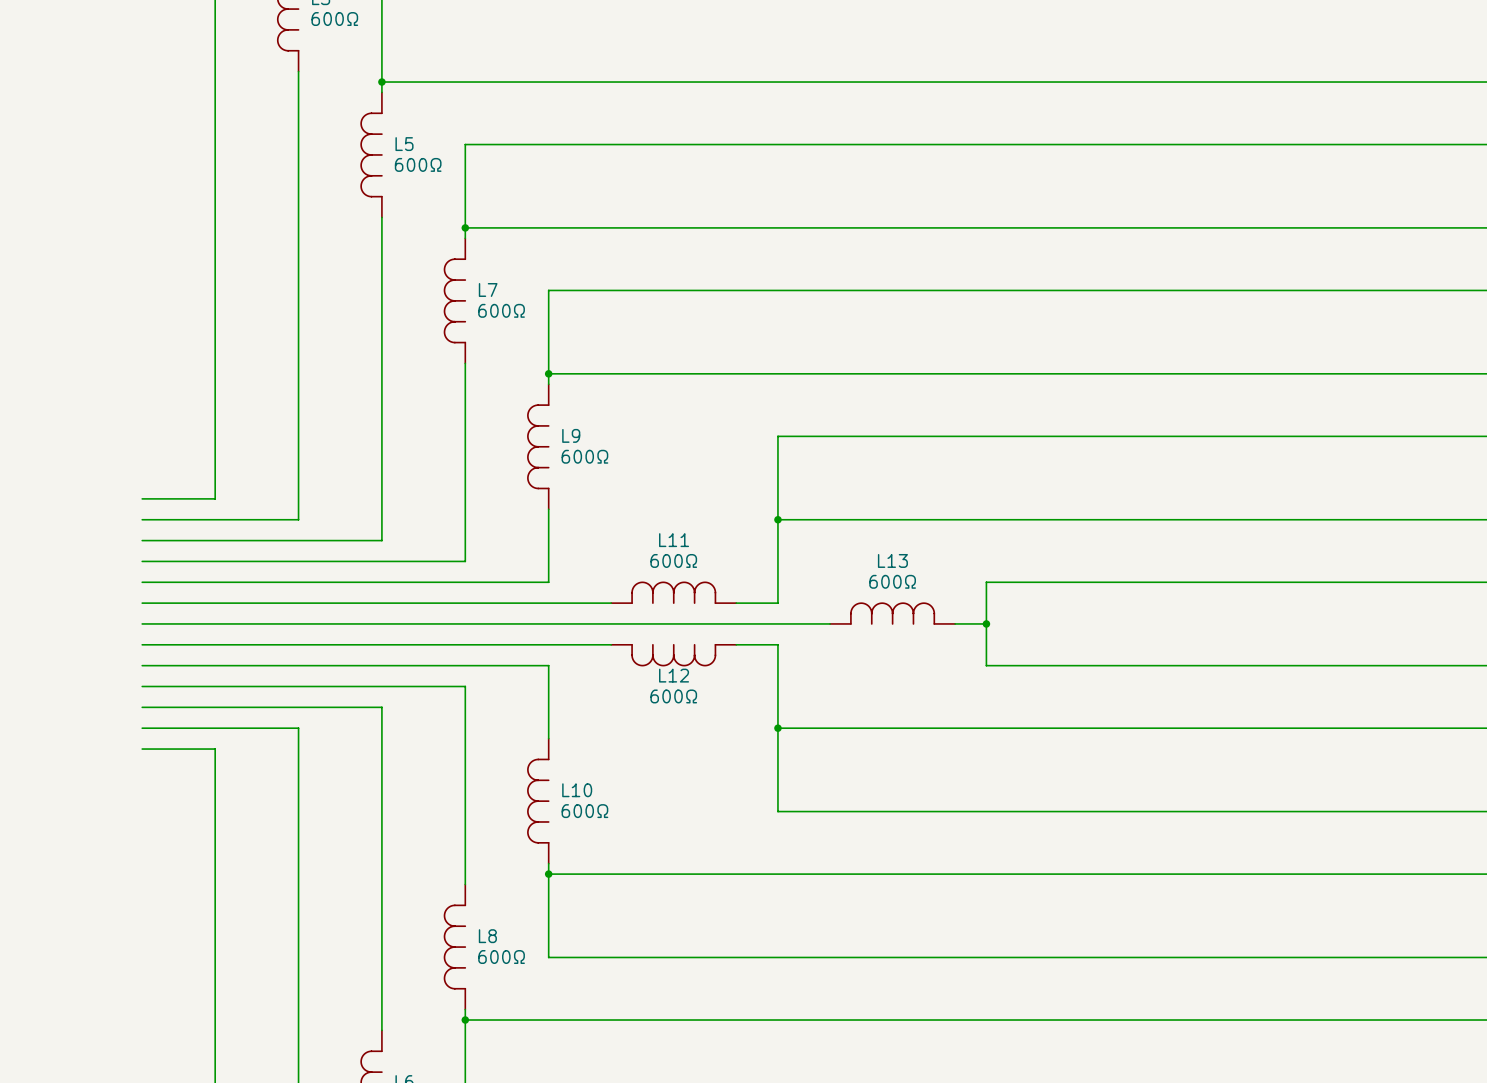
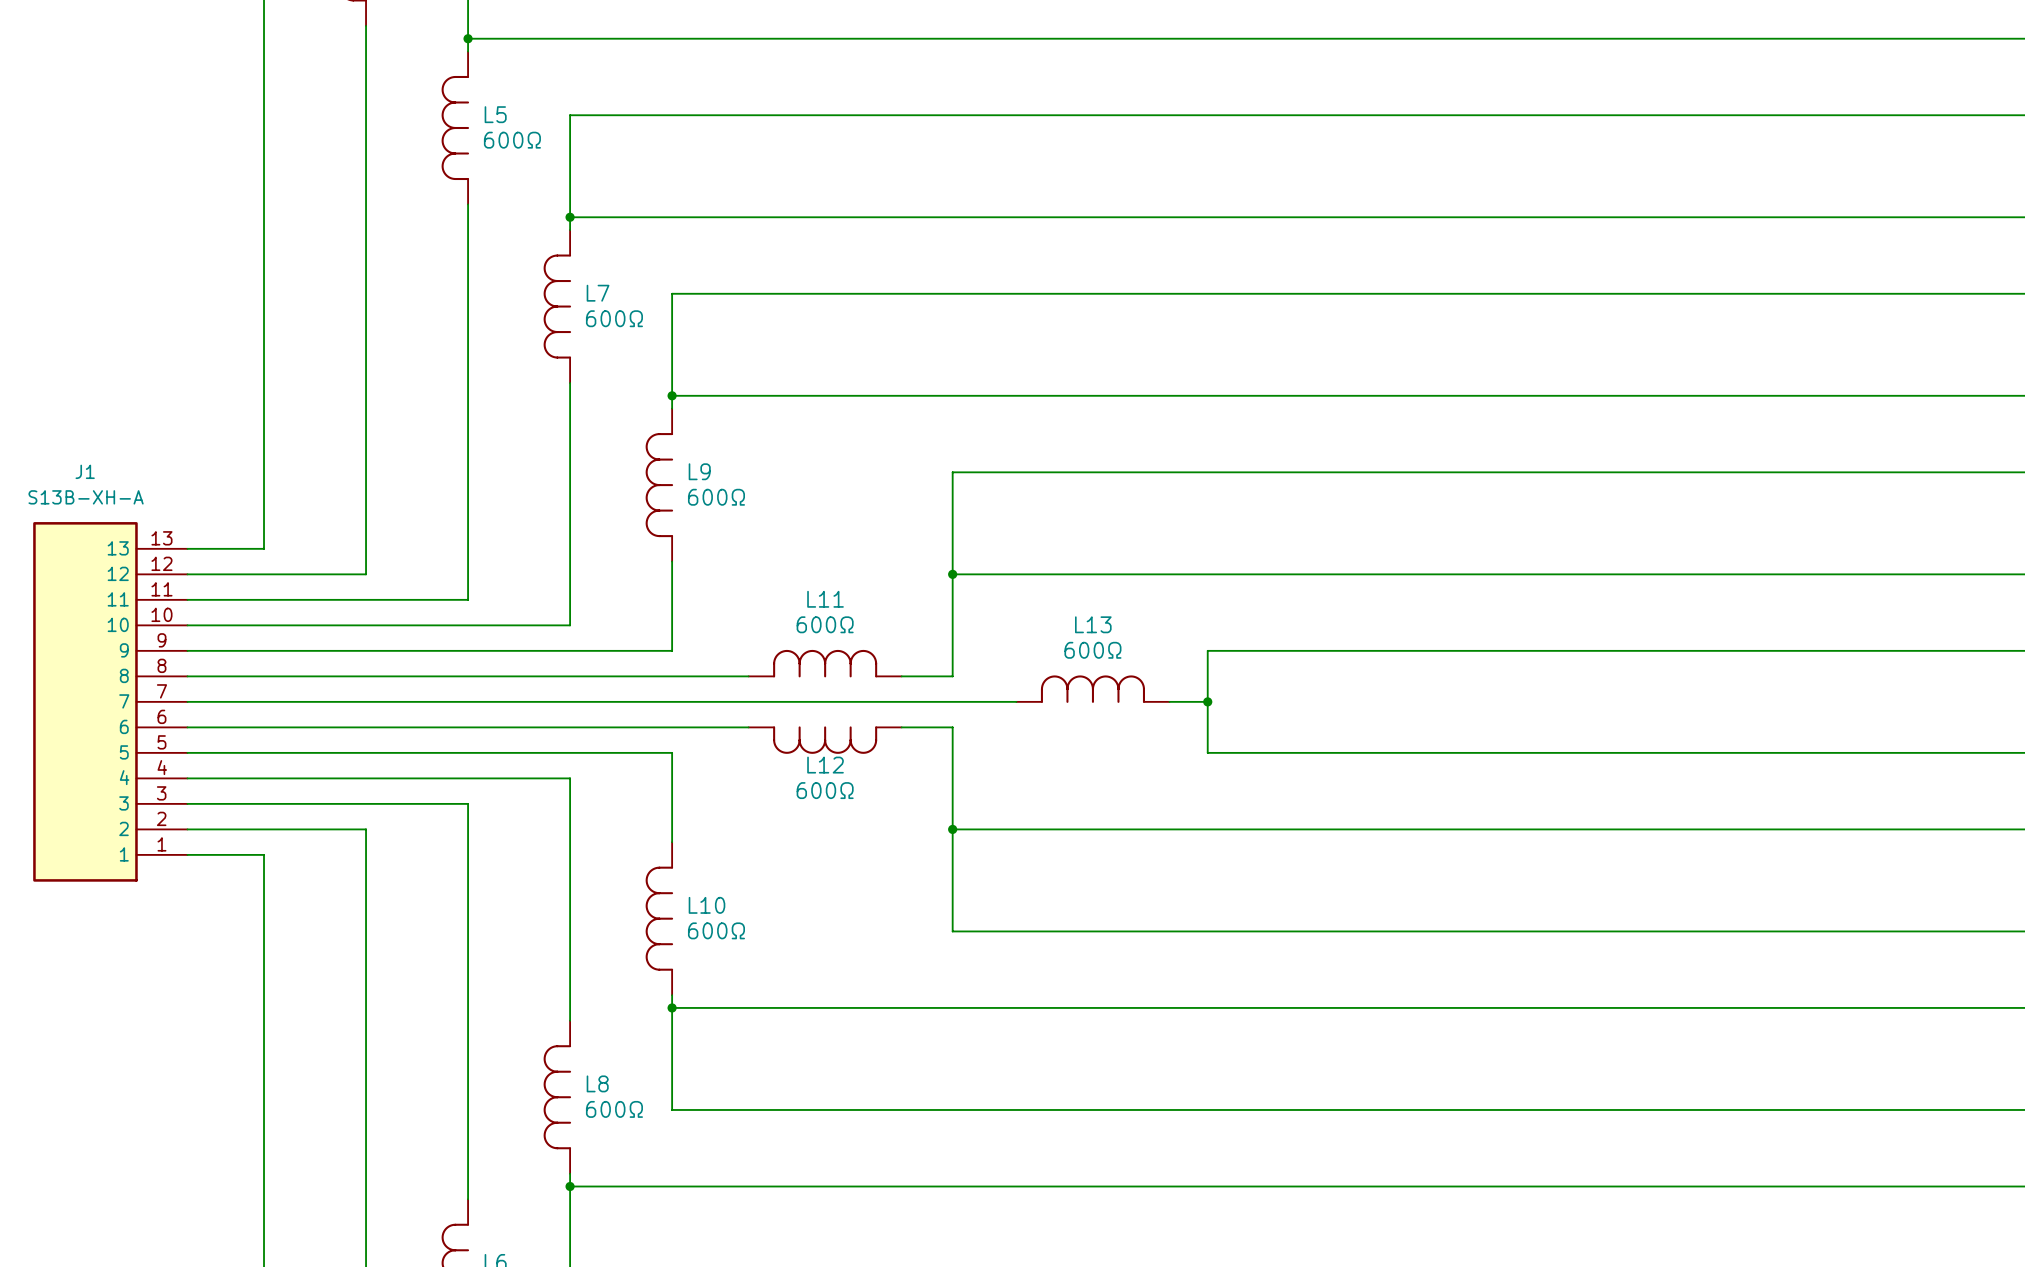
J1: none -> S13B-XH-A (110, 701)

